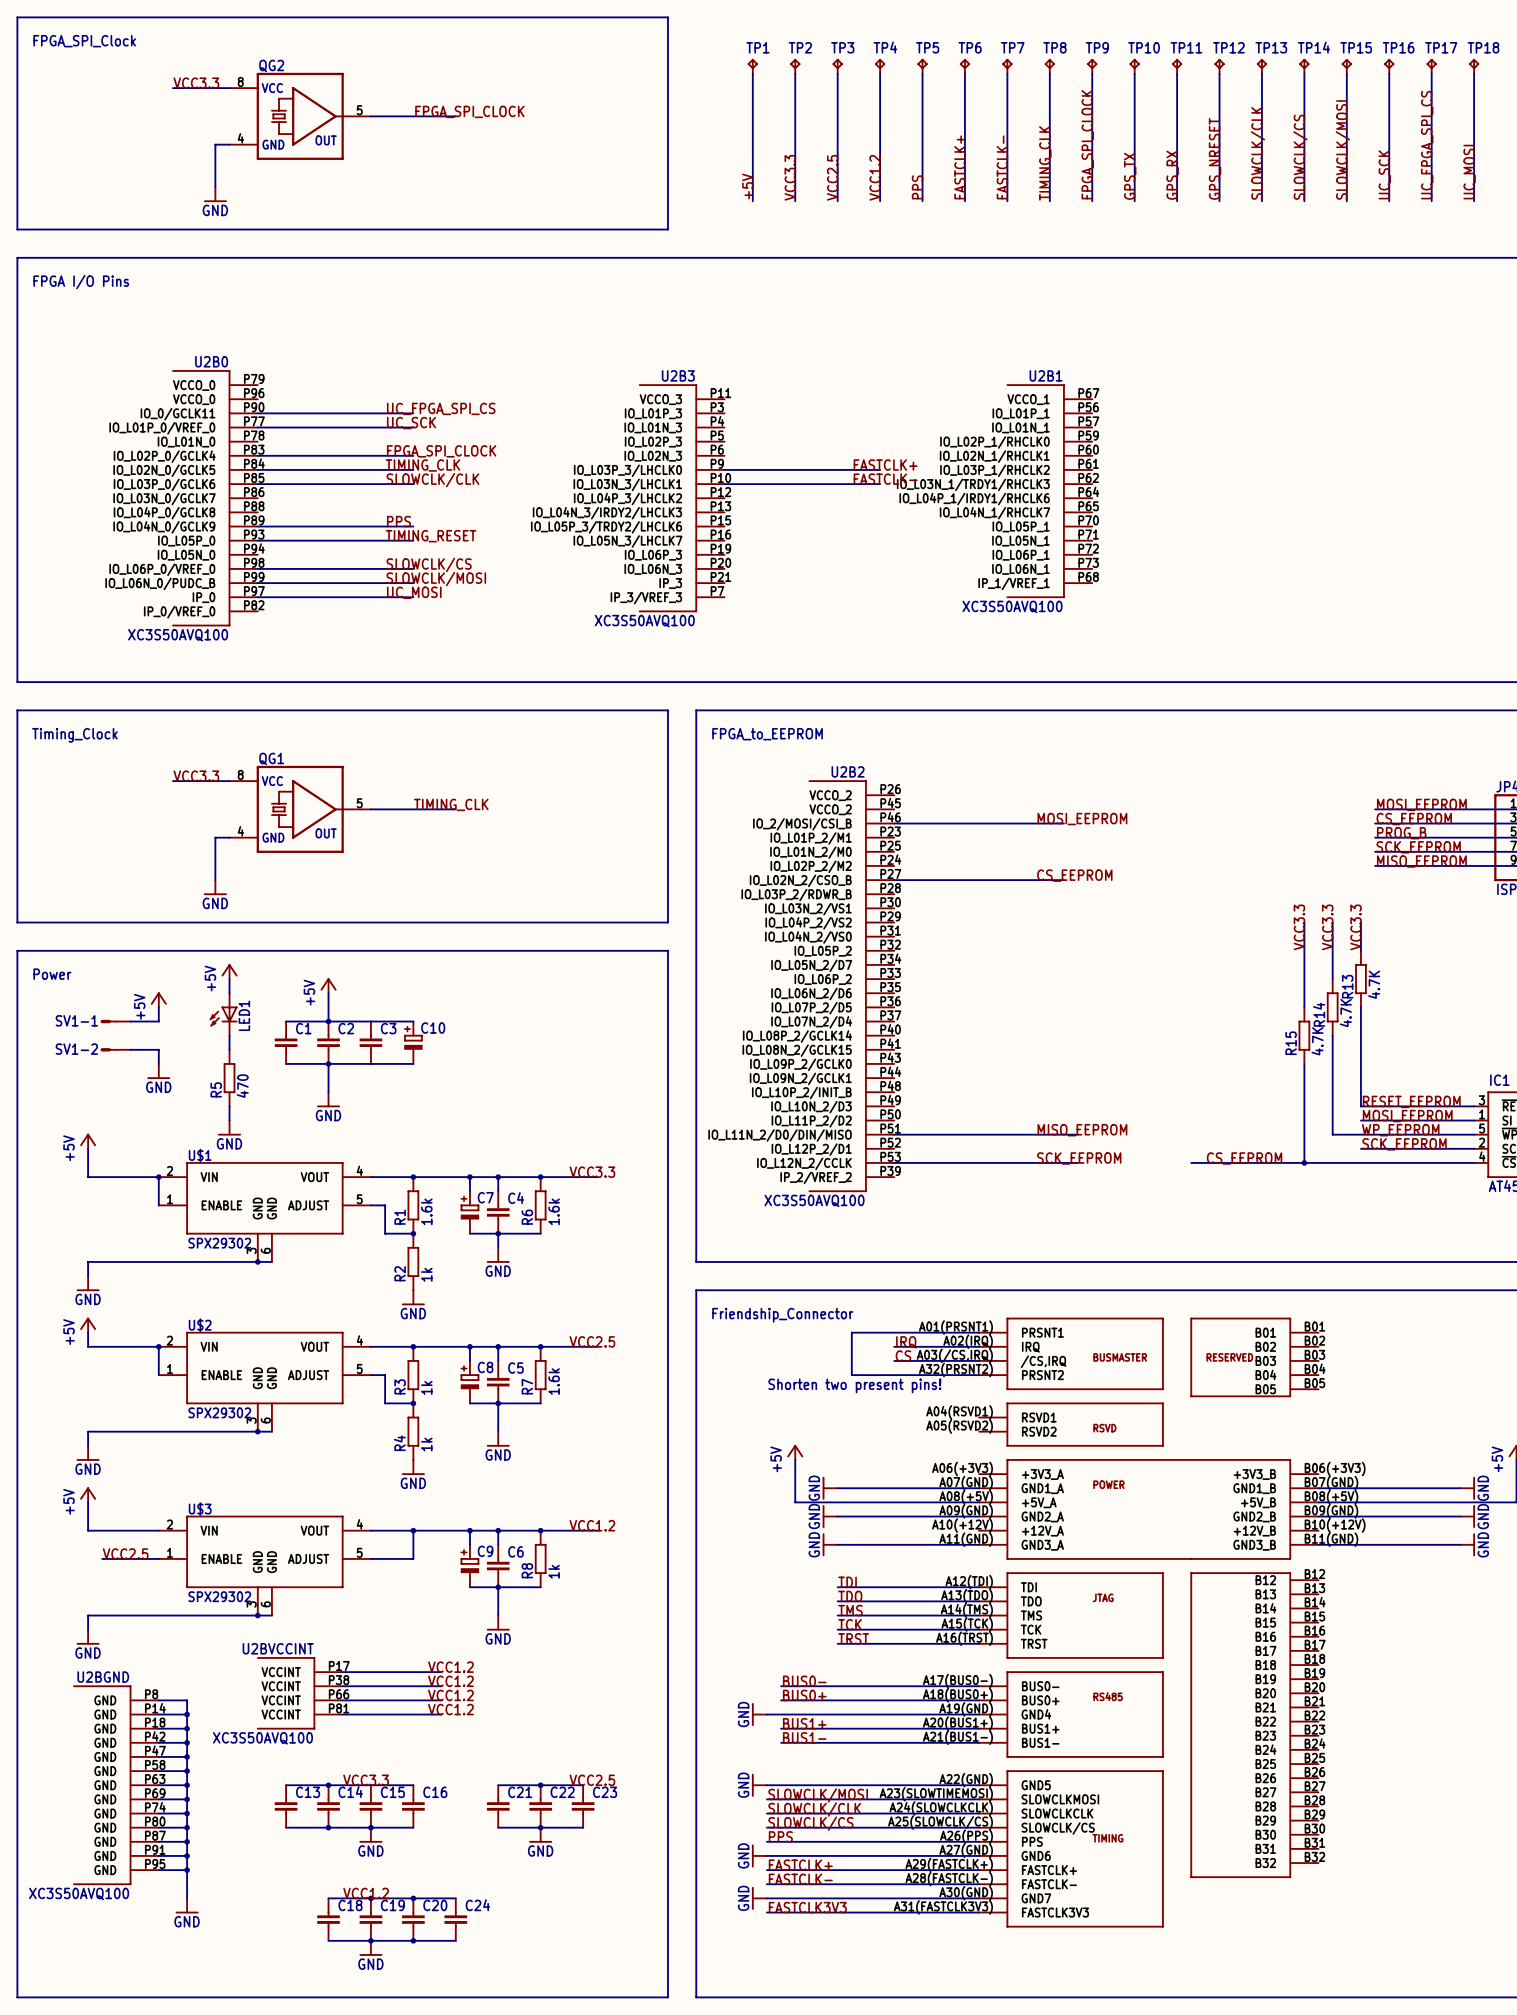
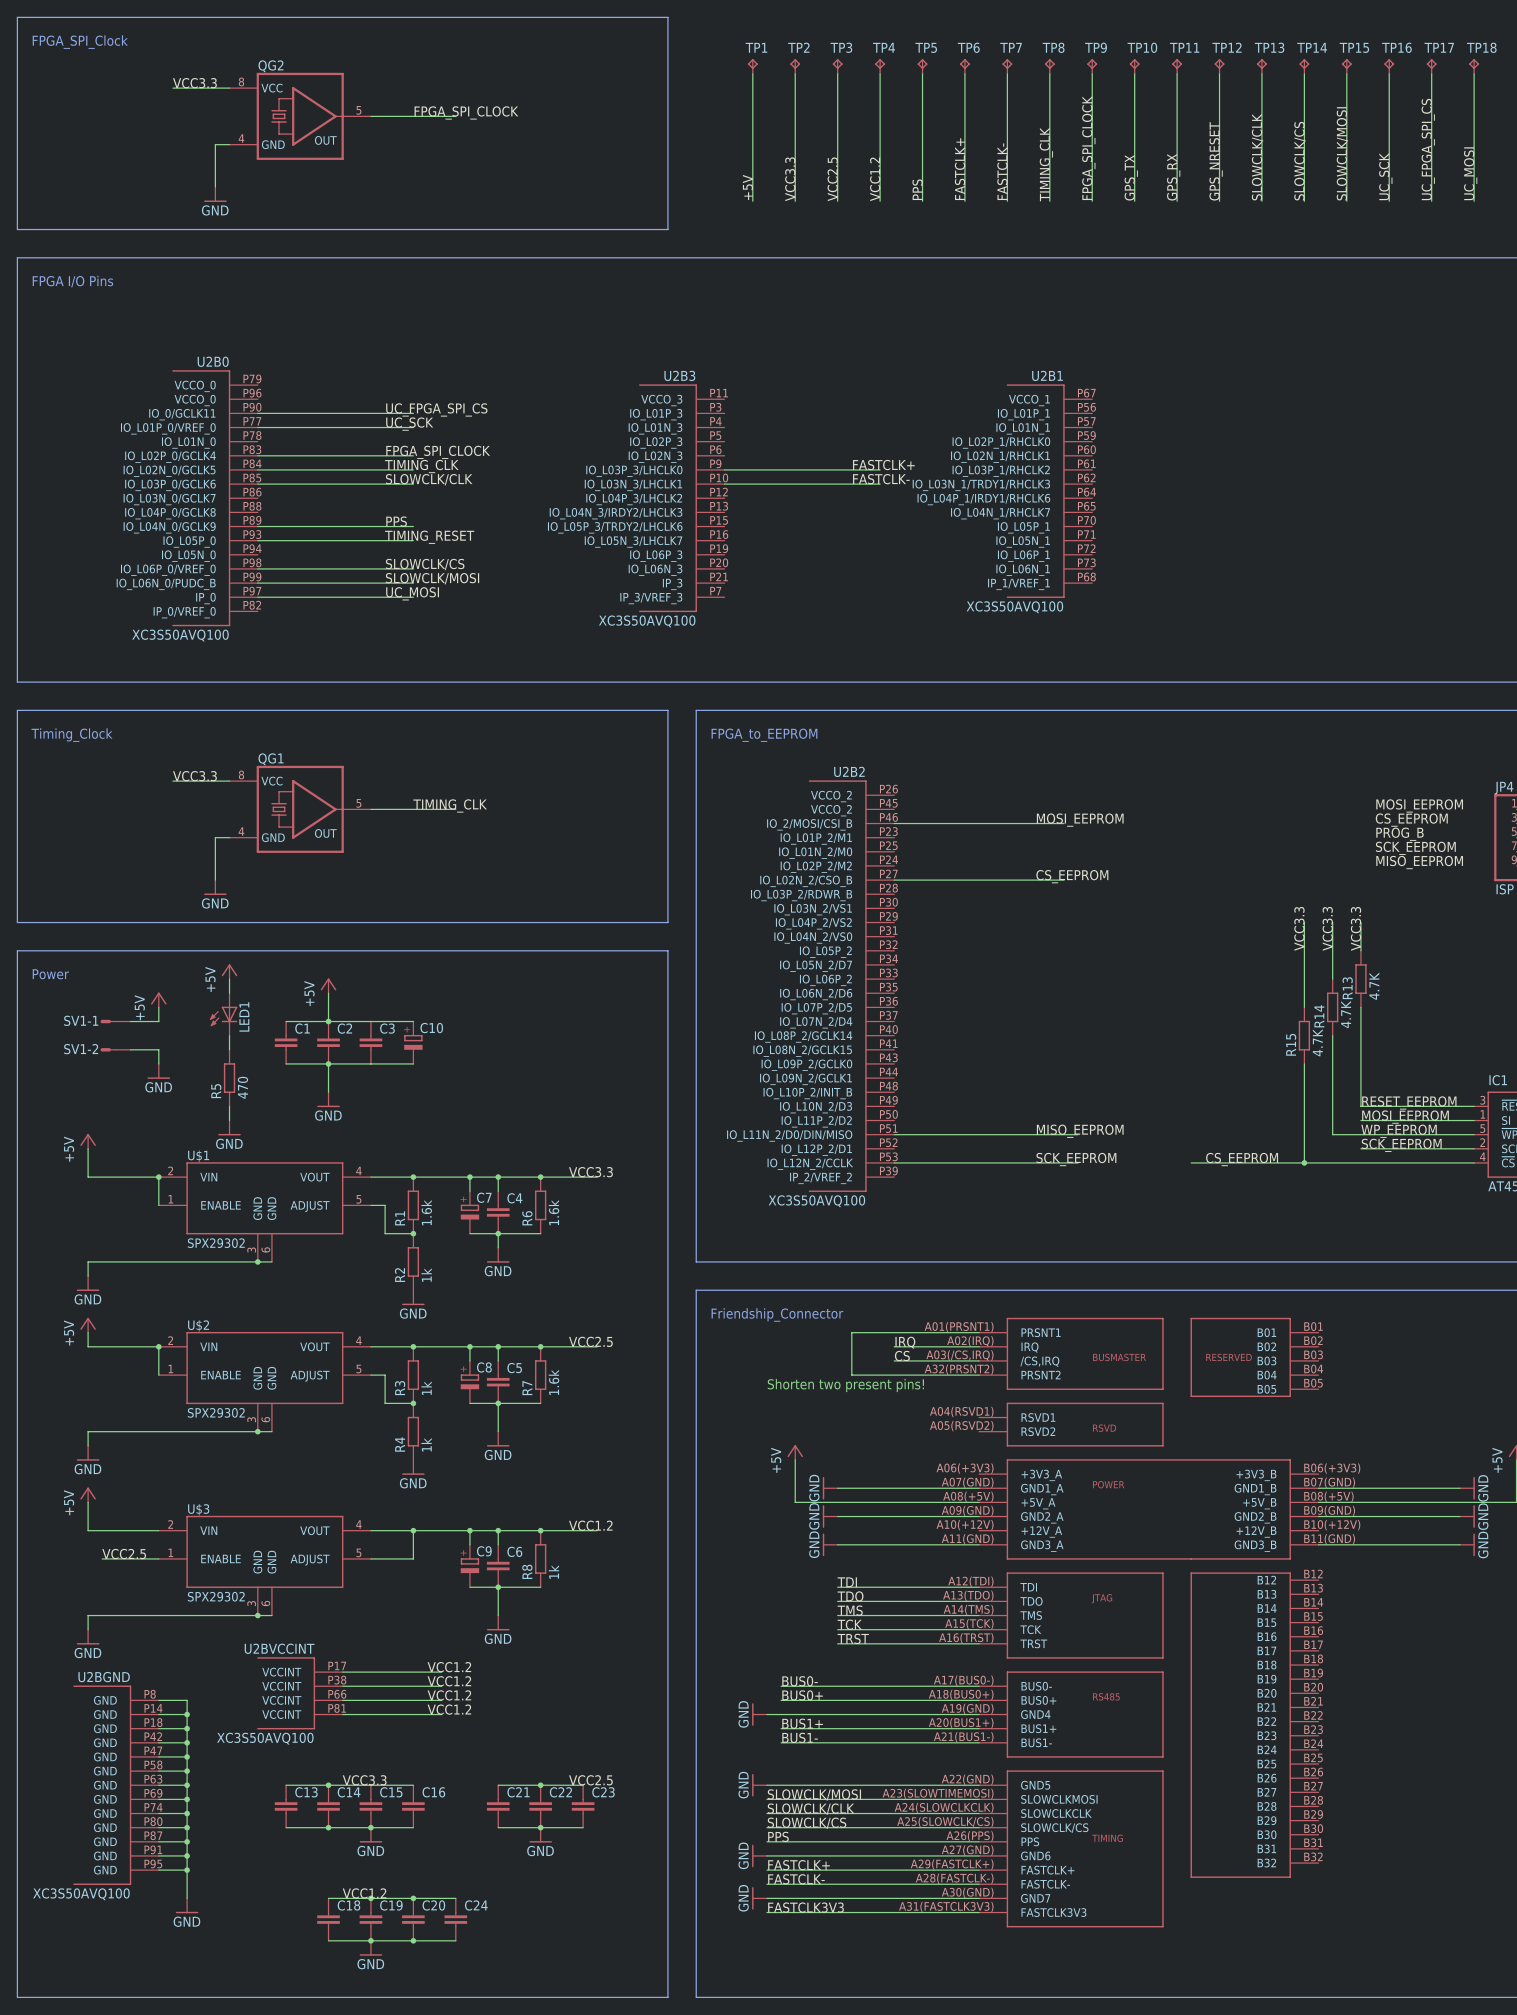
wire: (1375, 809) (1516, 809) -> none
wire: (1375, 823) (1516, 823) -> none
wire: (1375, 837) (1516, 837) -> none
wire: (1375, 851) (1516, 851) -> none
wire: (1375, 865) (1516, 865) -> none

